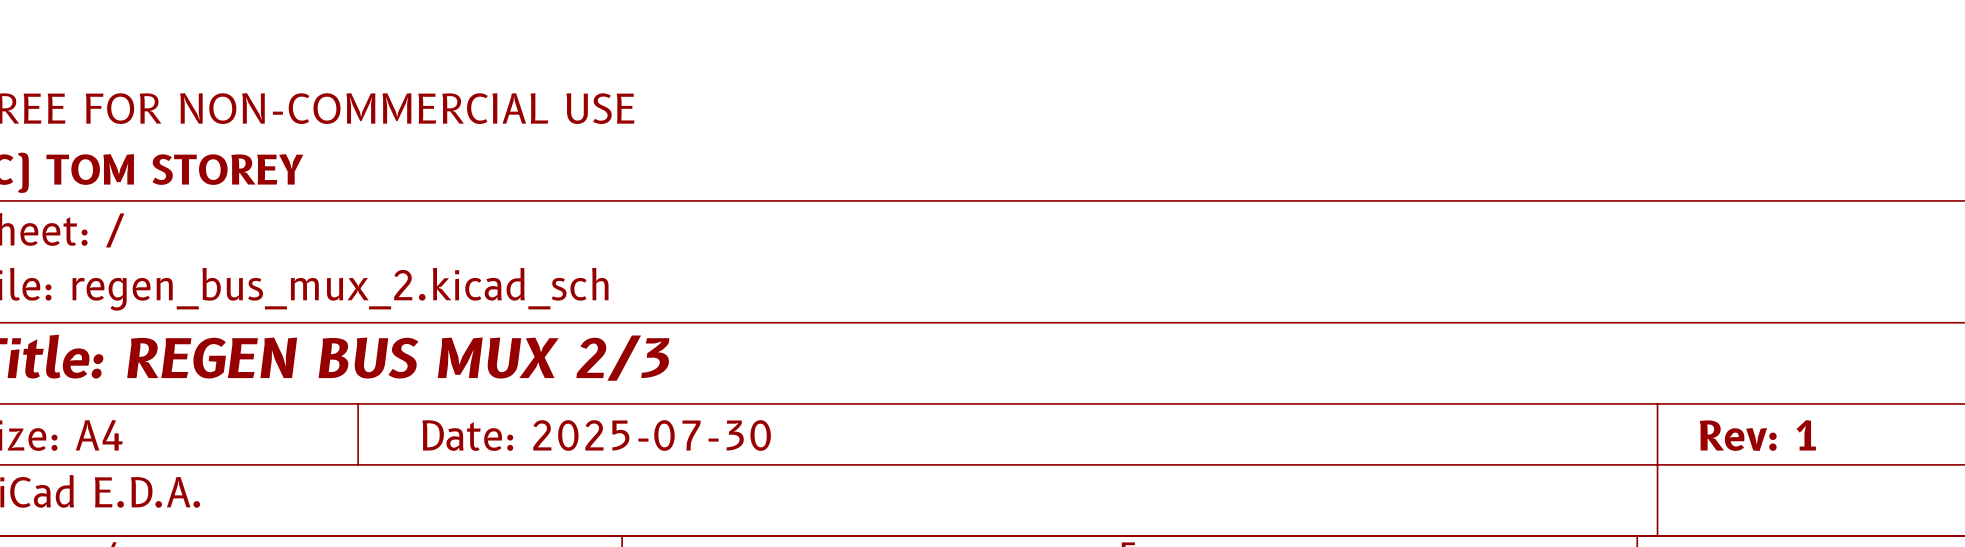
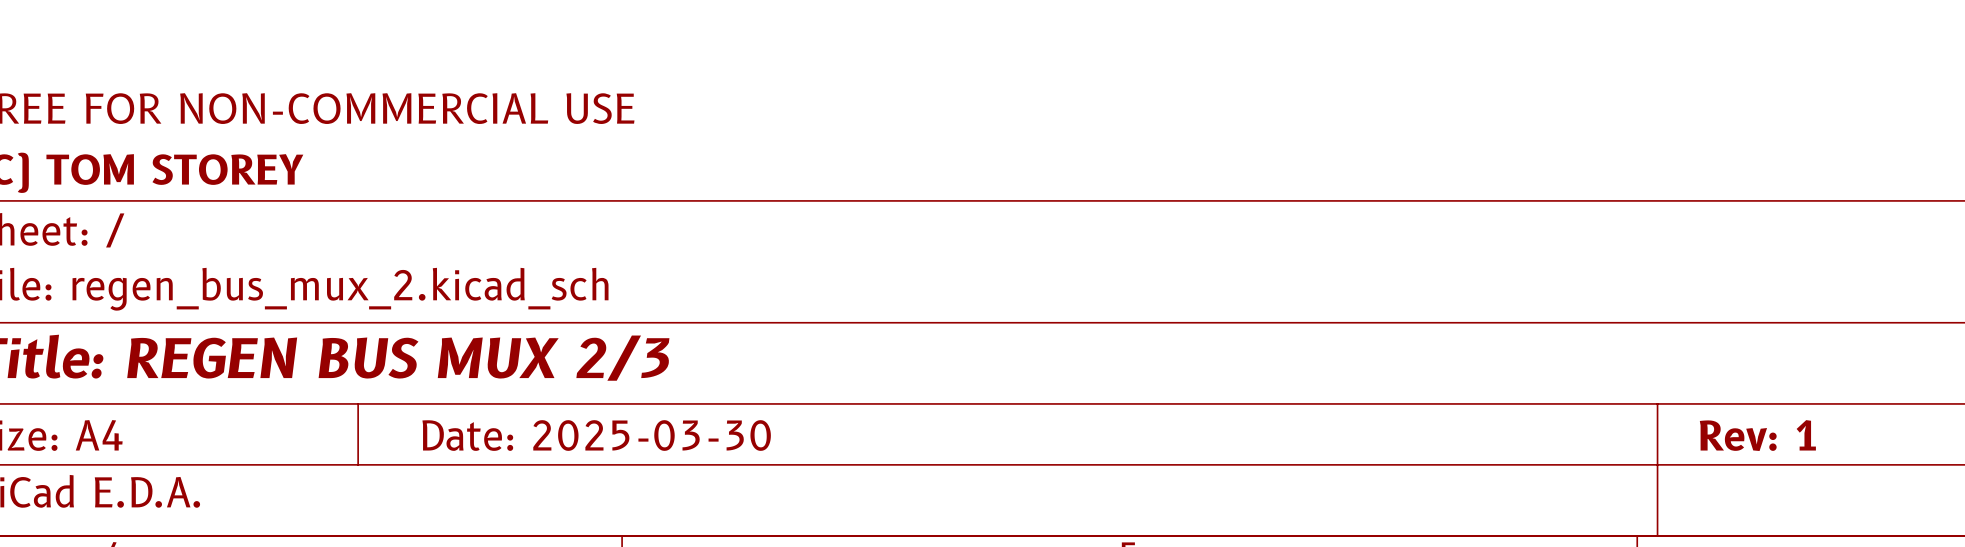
title block: Date: 2025-07-30 (596, 435) -> Date: 2025-03-30 (596, 435)

